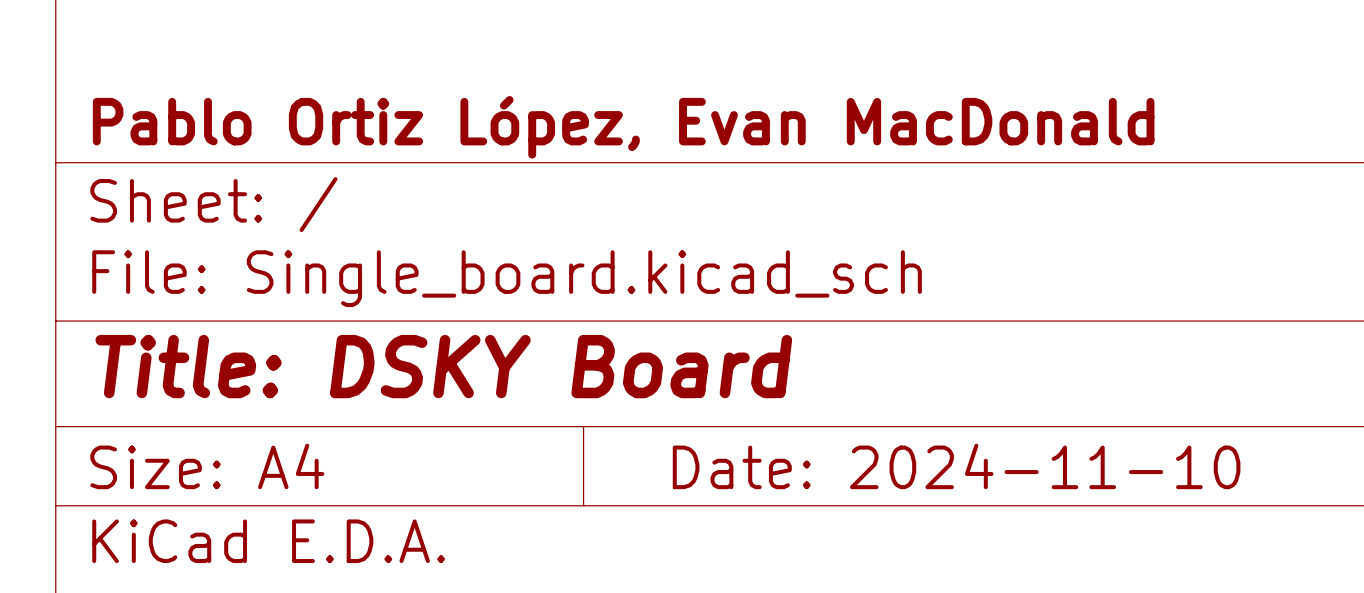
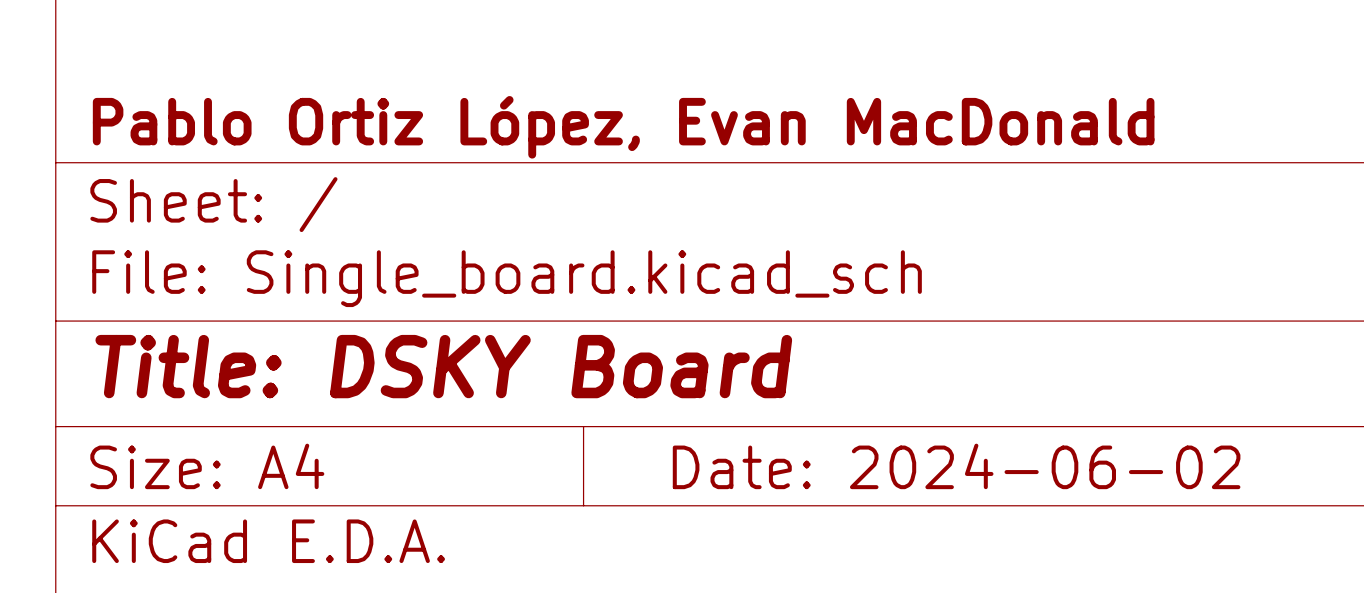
title block: Date: 2024-11-10 (956, 466) -> Date: 2024-06-02 (956, 466)

